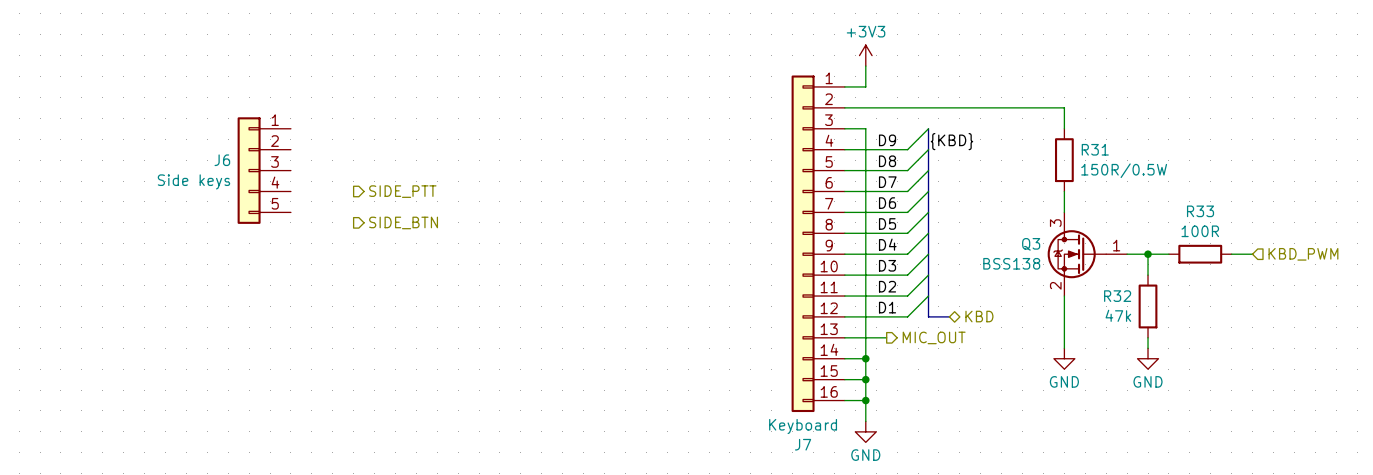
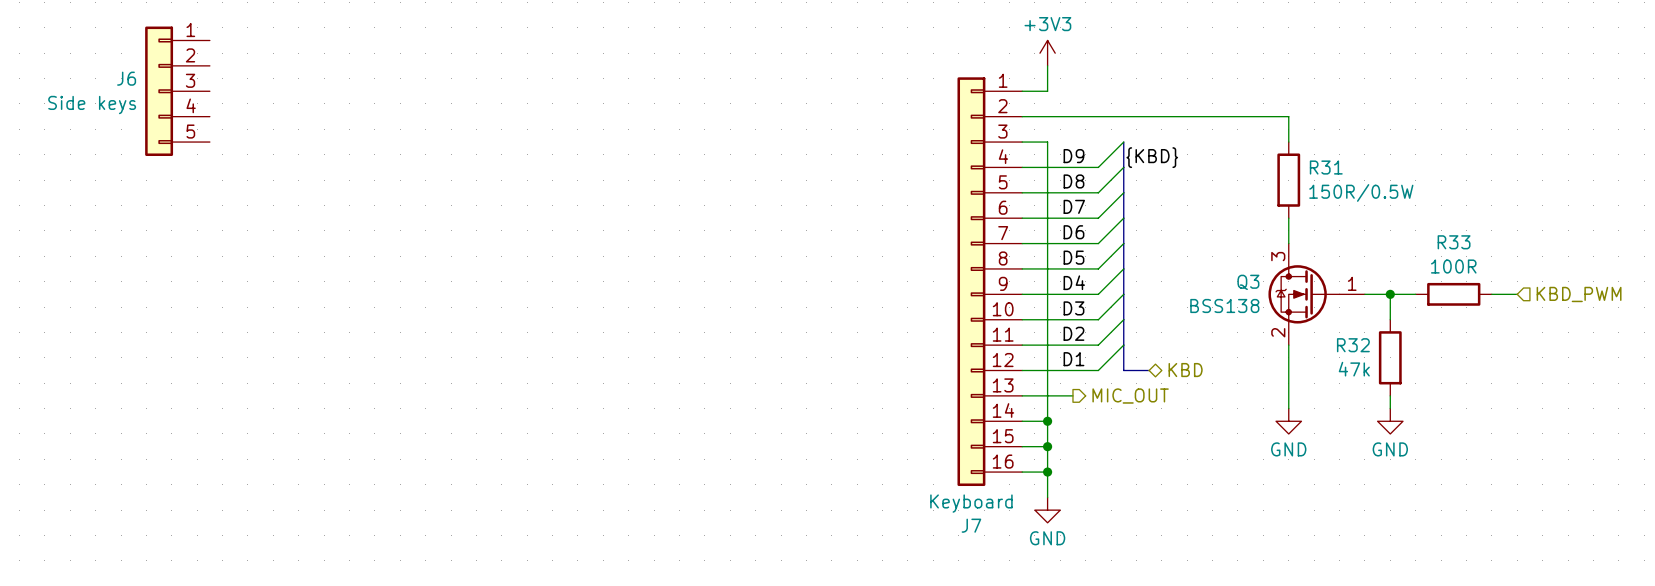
J6 position: (264, 170) -> (177, 91)
hierarchical label: SIDE_PTT (402, 191) -> none
hierarchical label: SIDE_BTN (403, 222) -> none

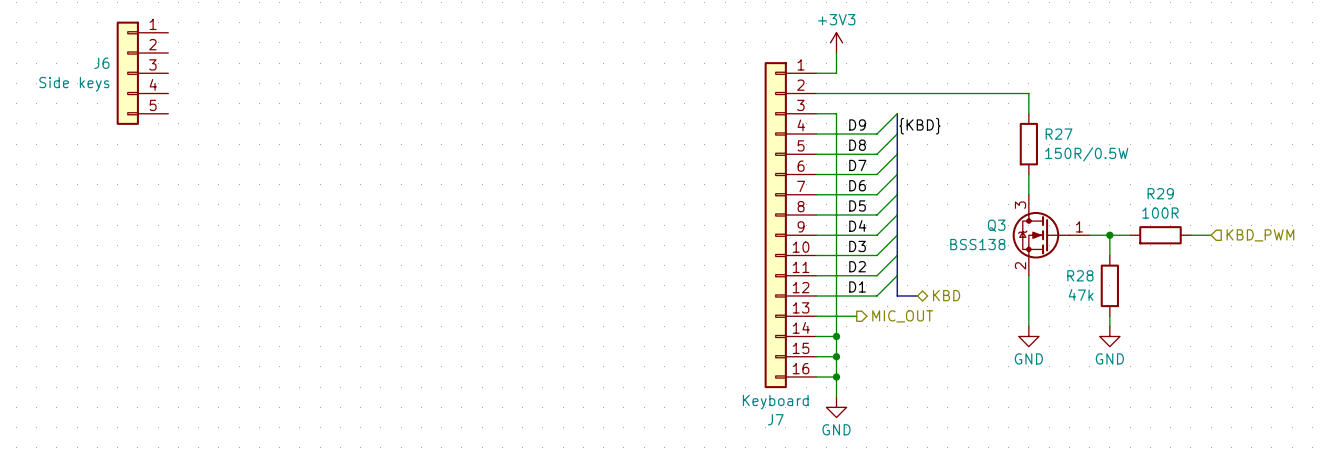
R31 name: R31 (1326, 167) -> R27 (1059, 134)
R33 name: R33 (1454, 242) -> R29 (1160, 193)
R32 name: R32 (1353, 345) -> R28 (1080, 275)

